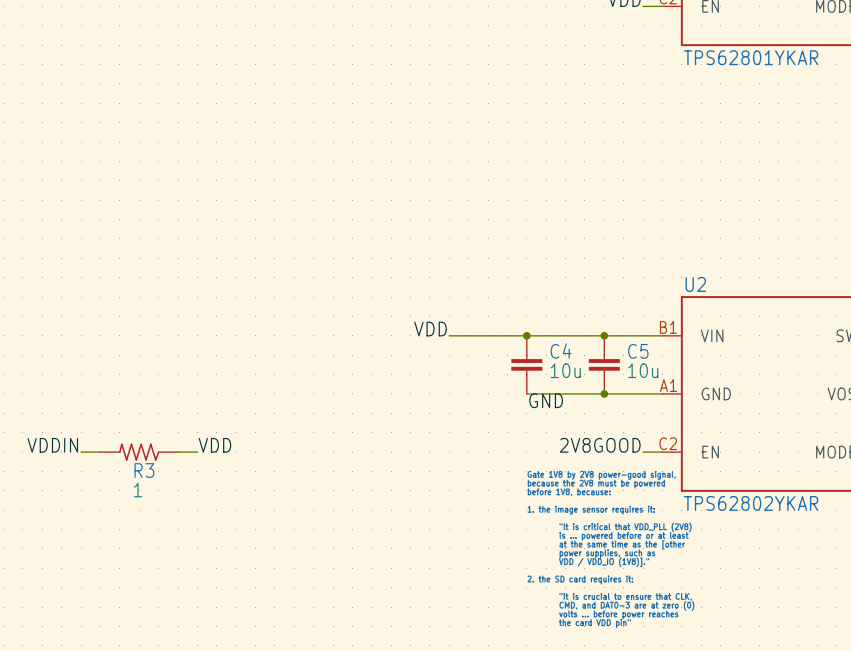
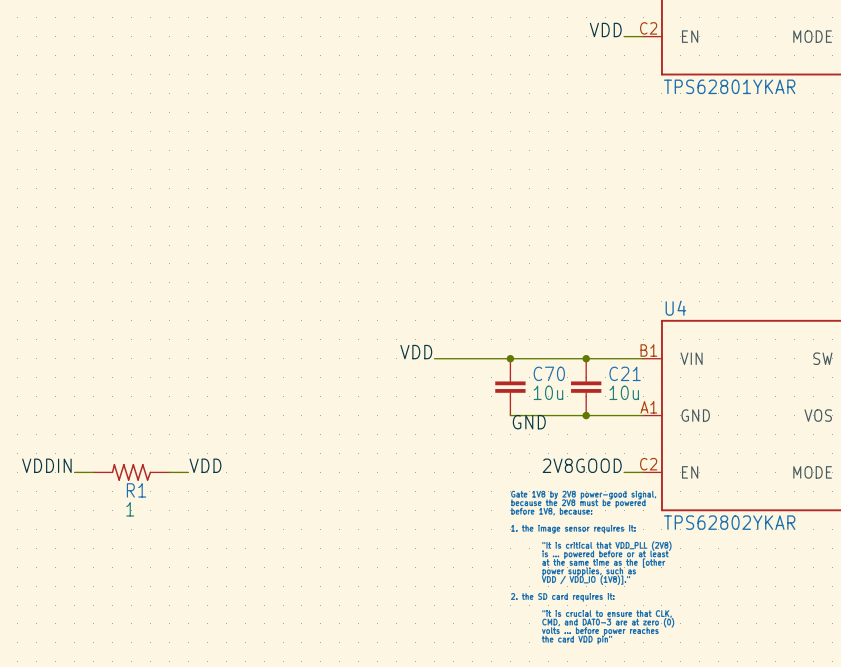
U2 name: U2 (695, 284) -> U4 (675, 308)
C4 name: C4 (561, 351) -> C70 (549, 373)
C5 name: C5 (638, 351) -> C21 (625, 373)
R3 name: R3 (144, 470) -> R1 (136, 490)

